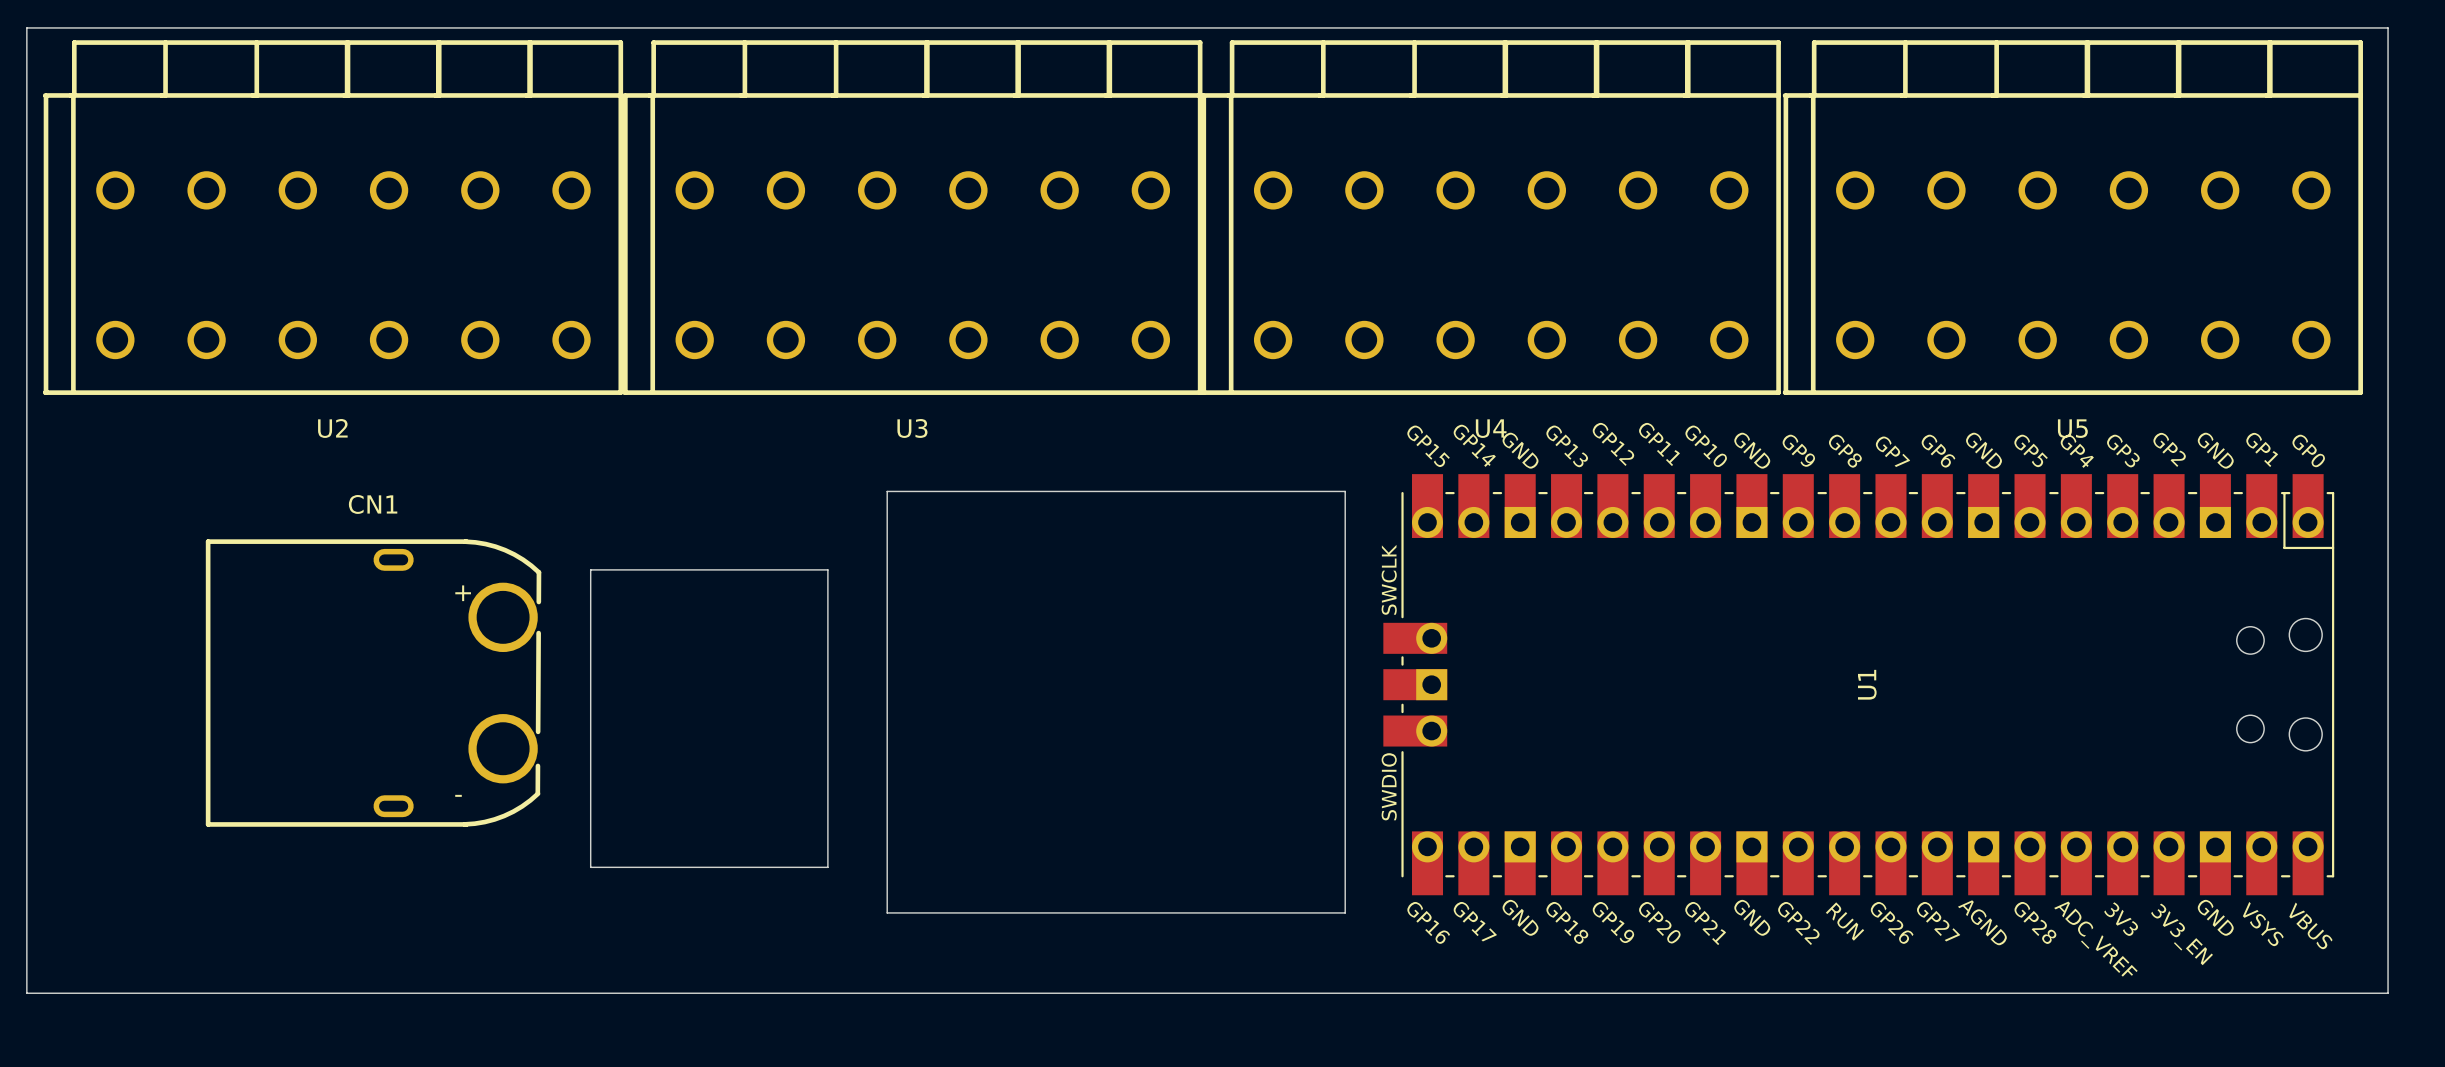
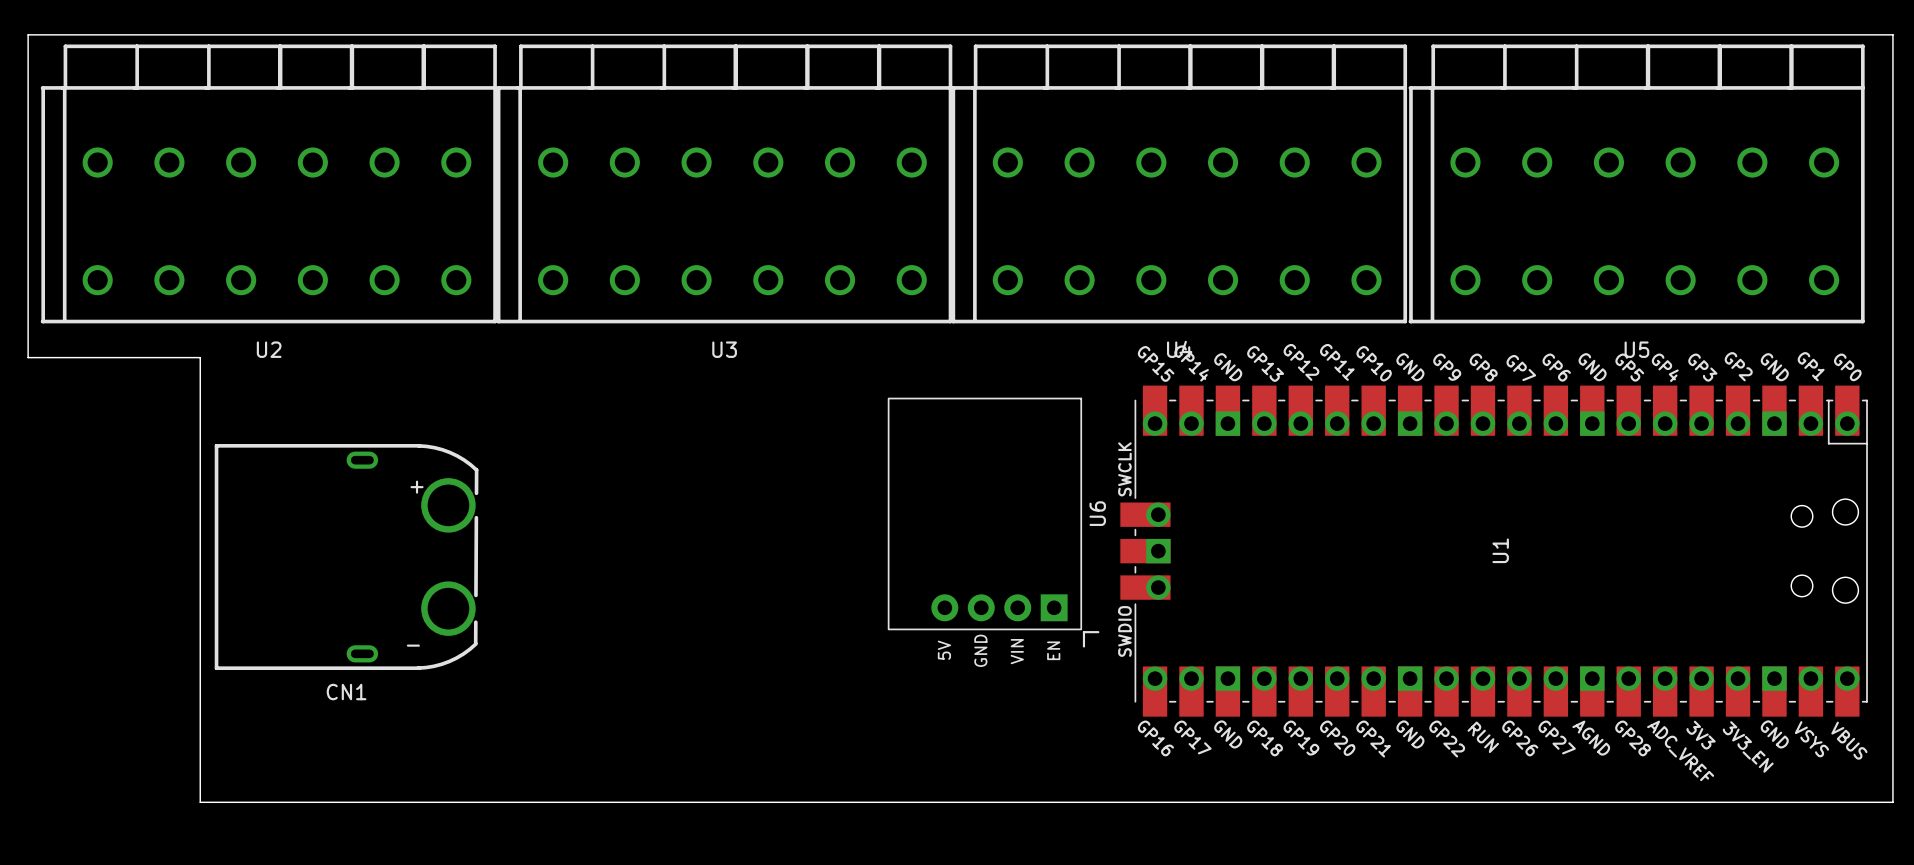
board edge: (2388, 27) (2388, 993) (26, 993) (26, 438) -> (1884, 34) (1892, 34) (1892, 802) (200, 802) (200, 357) (28, 357)
board edge: (887, 491) (1345, 491) (1345, 912) (887, 912) (887, 491) -> none
CN1 name position: CN1 (373, 504) -> CN1 (346, 692)
board edge: (590, 569) (827, 569) (827, 867) (590, 867) (590, 569) -> none
U6: none -> (993, 522)
CN1 position: (373, 683) -> (346, 557)
U1 position: (1858, 684) -> (1494, 551)

